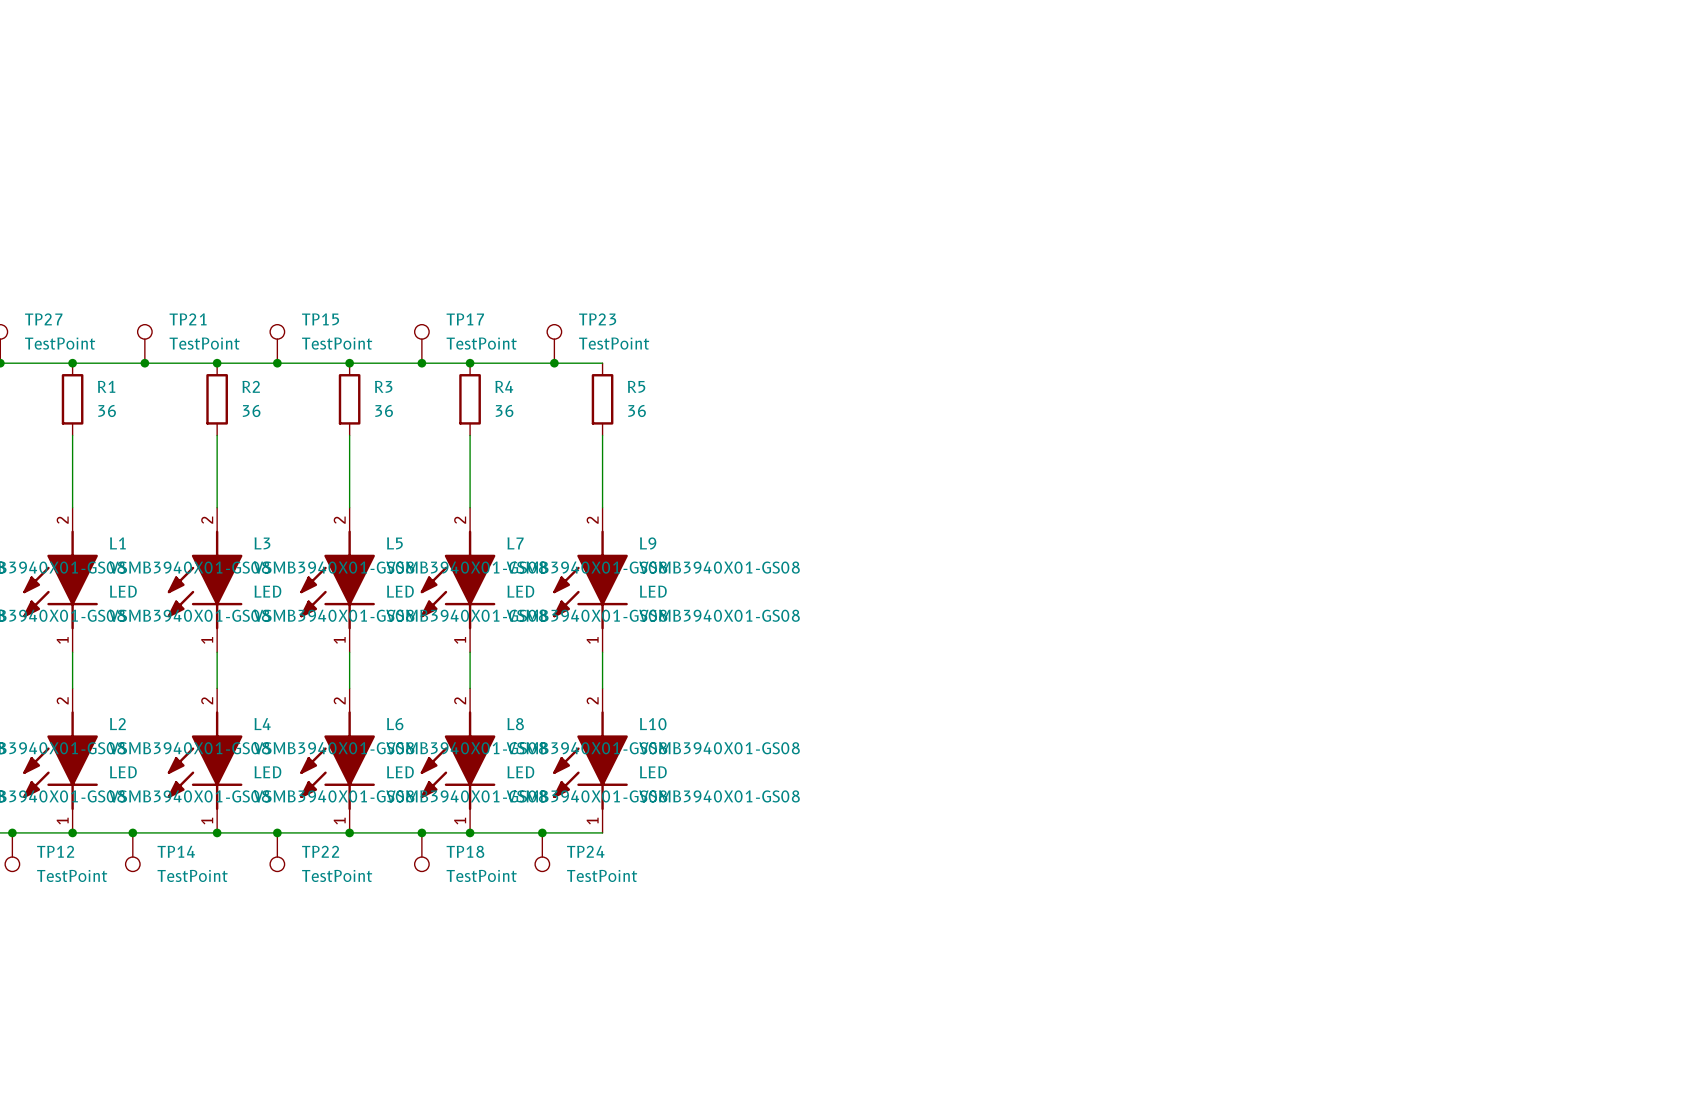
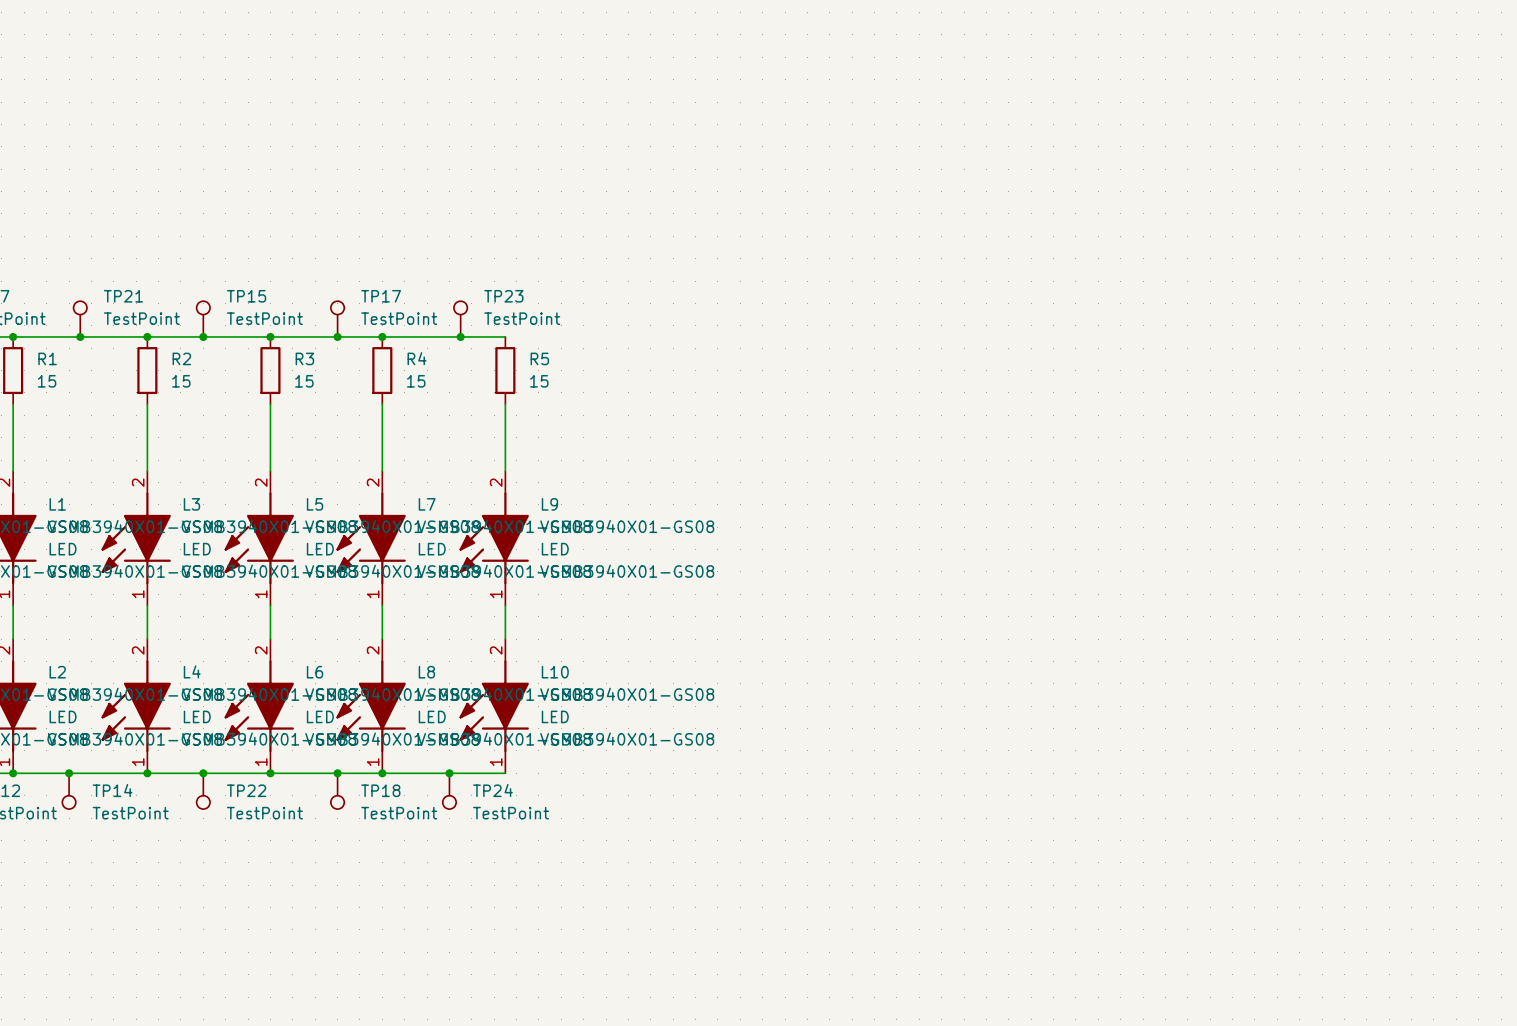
R1 value: 36 (107, 411) -> 15 (47, 381)
R2 value: 36 (251, 411) -> 15 (181, 381)
R3 value: 36 (384, 411) -> 15 (304, 381)
R4 value: 36 (504, 411) -> 15 (416, 381)
R5 value: 36 (637, 411) -> 15 (539, 381)

